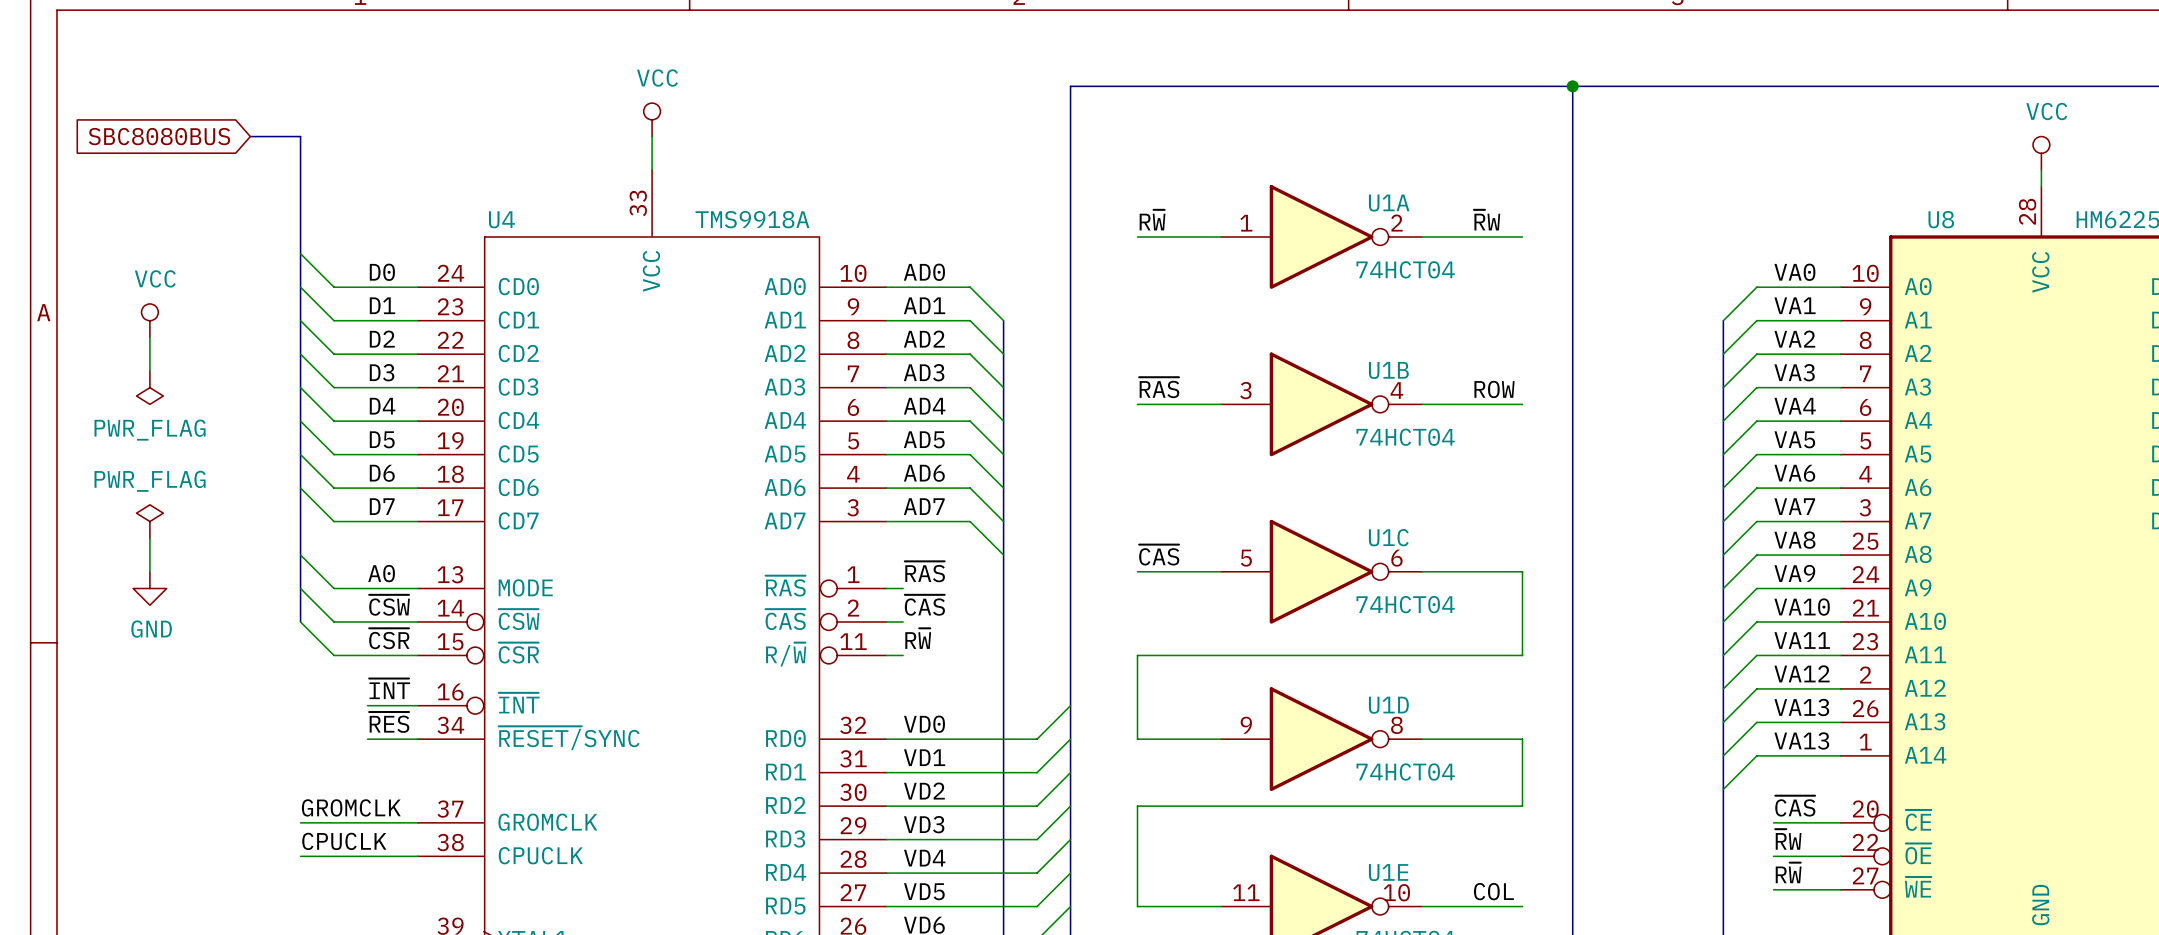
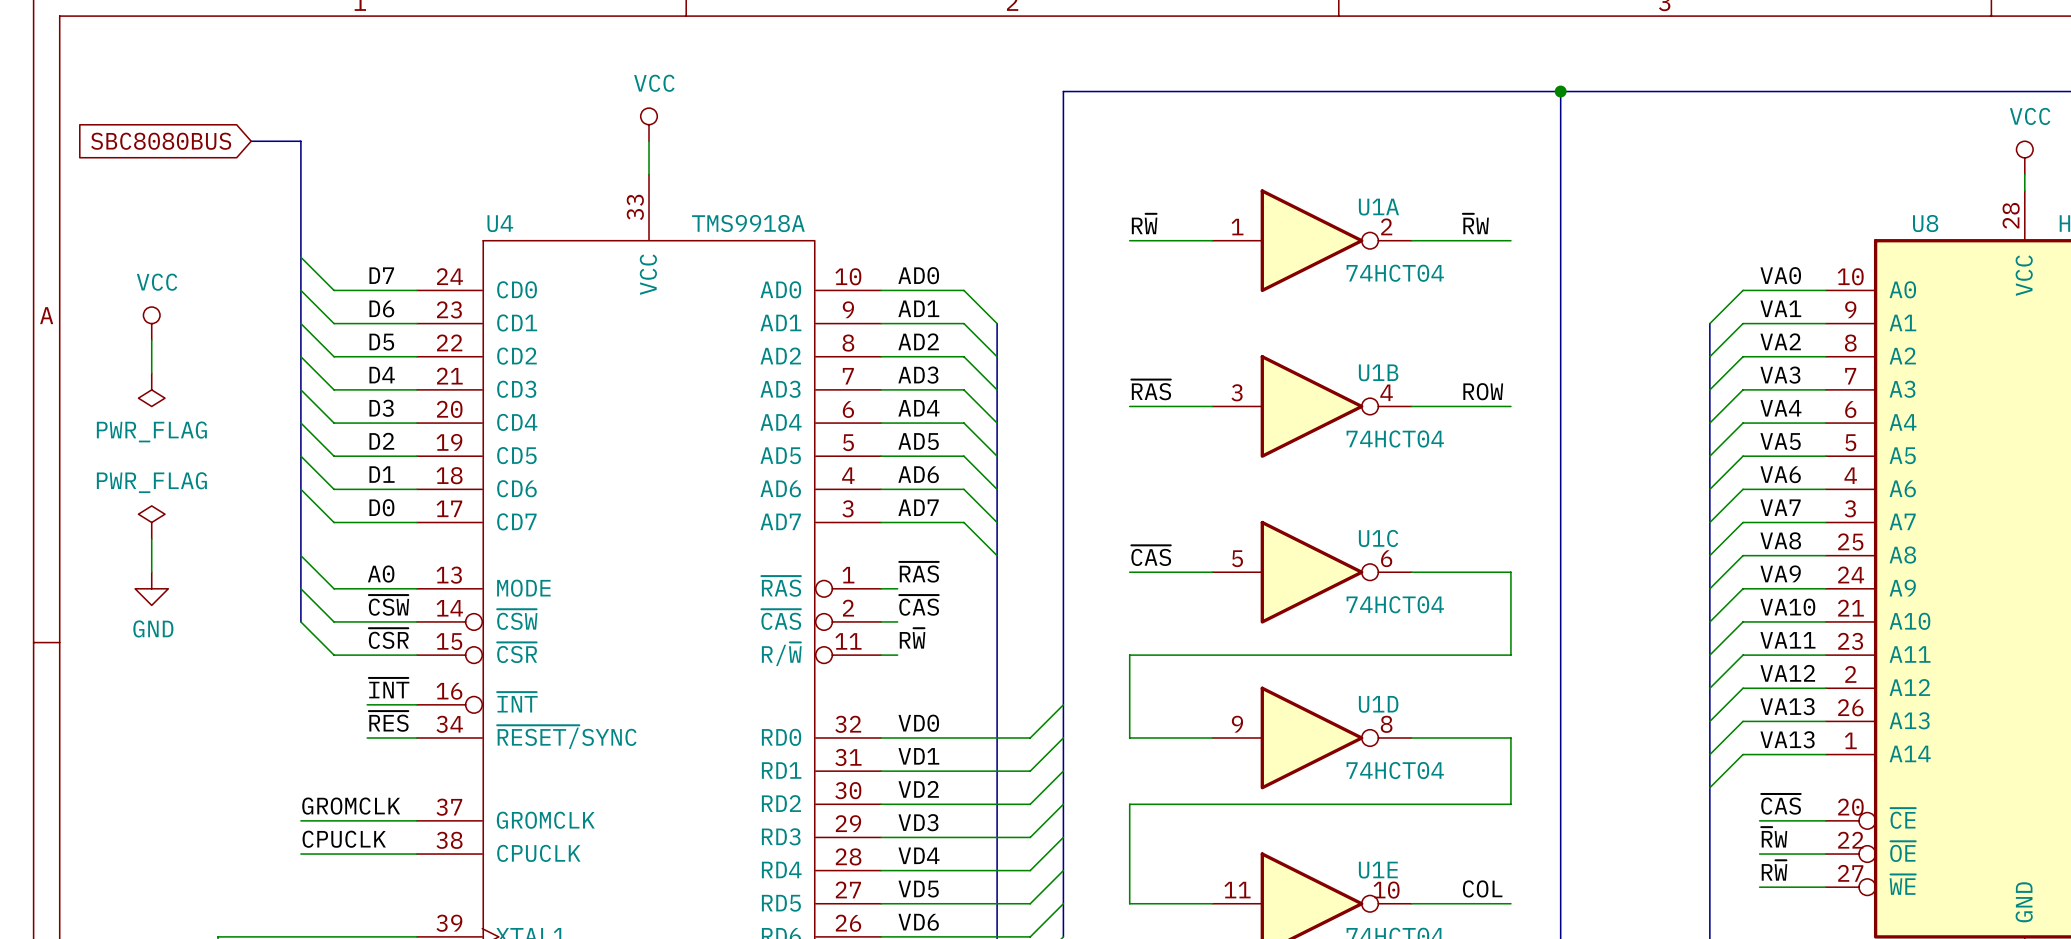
label: D0 (382, 272) -> D7 (381, 275)
label: D1 (382, 305) -> D6 (381, 308)
label: D2 (382, 339) -> D5 (381, 342)
label: D3 (382, 372) -> D4 (382, 375)
label: D4 (382, 406) -> D3 (381, 408)
label: D5 (382, 439) -> D2 (381, 441)
label: D6 (382, 473) -> D1 (382, 474)
label: D7 (382, 506) -> D0 (381, 507)

